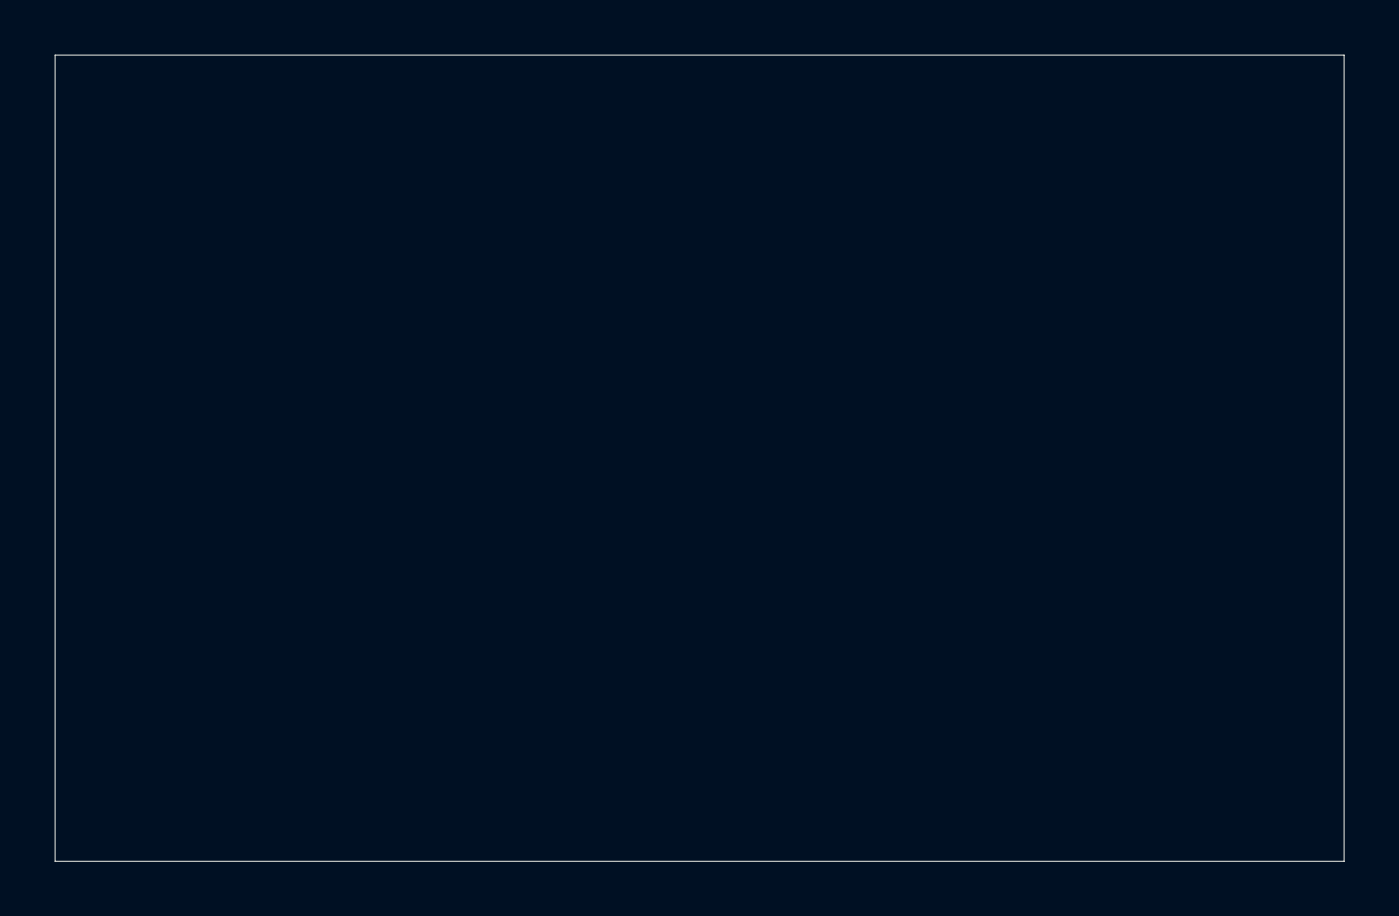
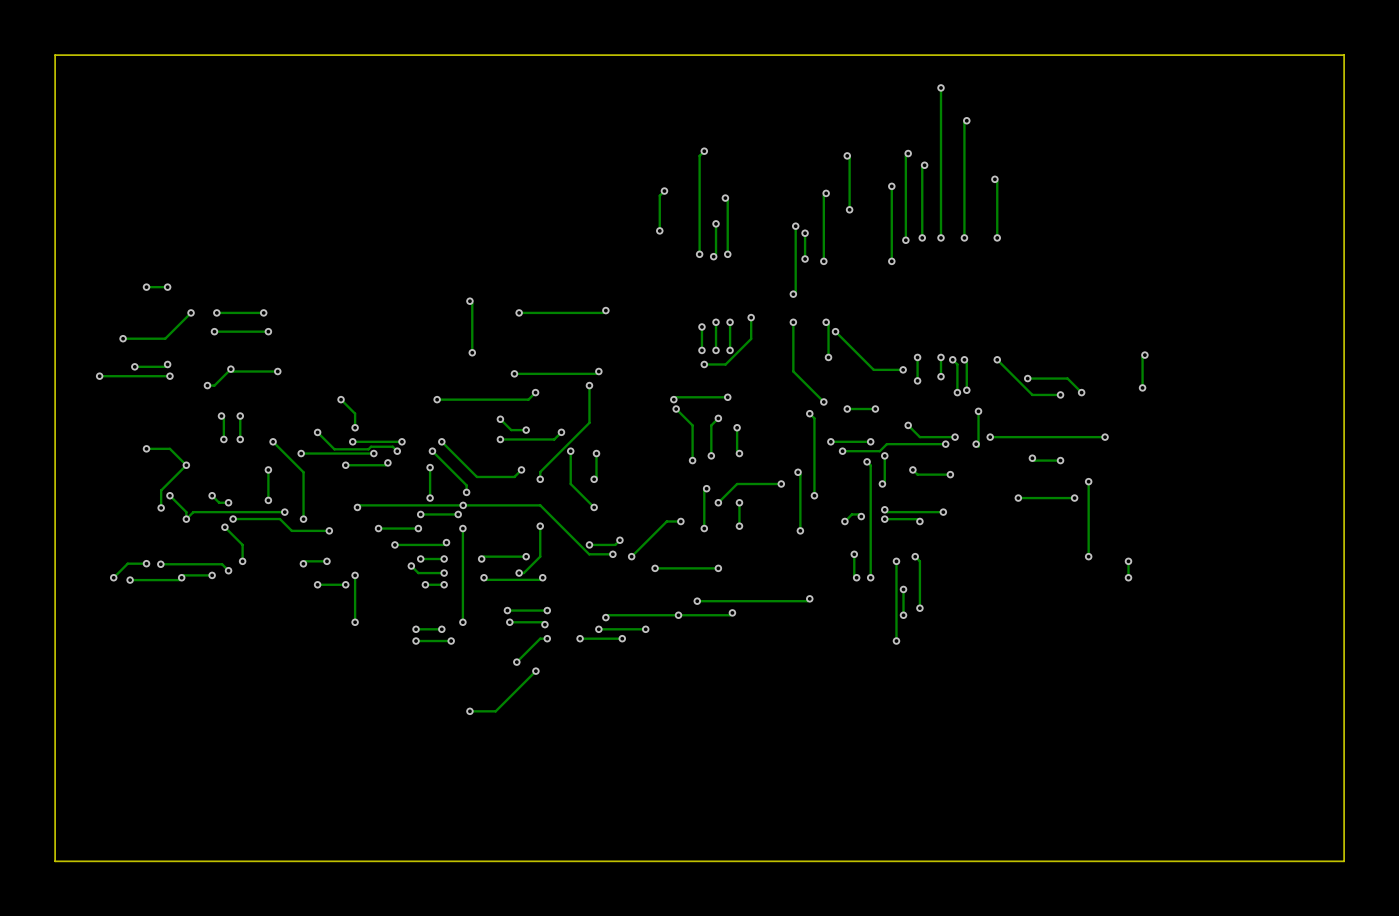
track: none -> (941, 87) (941, 237)
via: none -> (941, 87)
track: none -> (966, 120) (964, 123) (964, 237)
via: none -> (966, 120)
track: none -> (704, 151) (699, 155) (699, 254)
via: none -> (704, 151)
track: none -> (908, 153) (905, 155) (905, 240)
via: none -> (908, 153)
track: none -> (847, 155) (849, 158) (849, 209)
via: none -> (847, 155)
track: none -> (924, 165) (922, 167) (922, 237)
via: none -> (924, 165)
track: none -> (994, 179) (997, 181) (997, 237)
via: none -> (994, 179)
track: none -> (891, 186) (891, 261)
via: none -> (891, 186)
track: none -> (664, 191) (659, 195) (659, 230)
via: none -> (664, 191)
track: none -> (826, 193) (823, 195) (823, 261)
via: none -> (826, 193)
track: none -> (725, 198) (727, 200) (727, 254)
via: none -> (725, 198)
via: none -> (849, 209)
track: none -> (716, 223) (716, 254) (713, 256)
via: none -> (716, 223)
track: none -> (795, 226) (795, 291) (793, 294)
via: none -> (795, 226)
via: none -> (659, 230)
track: none -> (805, 233) (805, 259)
via: none -> (805, 233)
via: none -> (922, 237)
via: none -> (941, 237)
via: none -> (964, 237)
via: none -> (997, 237)
via: none -> (905, 240)
via: none -> (699, 254)
via: none -> (727, 254)
via: none -> (713, 256)
via: none -> (805, 259)
via: none -> (823, 261)
via: none -> (891, 261)
via: none -> (146, 287)
track: none -> (167, 287) (146, 287)
via: none -> (167, 287)
via: none -> (793, 294)
track: none -> (469, 301) (472, 303) (472, 352)
via: none -> (469, 301)
track: none -> (605, 310) (603, 312) (519, 312)
via: none -> (605, 310)
track: none -> (191, 312) (165, 338) (123, 338)
via: none -> (191, 312)
via: none -> (216, 312)
track: none -> (263, 312) (216, 312)
via: none -> (263, 312)
via: none -> (519, 312)
track: none -> (751, 317) (751, 338) (725, 364) (704, 364)
via: none -> (751, 317)
track: none -> (716, 322) (716, 350)
via: none -> (716, 322)
track: none -> (730, 322) (730, 350)
via: none -> (730, 322)
track: none -> (793, 322) (793, 371) (823, 401)
via: none -> (793, 322)
track: none -> (826, 322) (828, 324) (828, 357)
via: none -> (826, 322)
track: none -> (701, 326) (701, 350)
via: none -> (701, 326)
via: none -> (214, 331)
track: none -> (268, 331) (214, 331)
via: none -> (268, 331)
track: none -> (835, 331) (873, 369) (903, 369)
via: none -> (835, 331)
via: none -> (123, 338)
via: none -> (701, 350)
via: none -> (716, 350)
via: none -> (730, 350)
via: none -> (472, 352)
track: none -> (1144, 355) (1142, 357) (1142, 387)
via: none -> (1144, 355)
via: none -> (828, 357)
track: none -> (917, 357) (917, 380)
via: none -> (917, 357)
track: none -> (941, 357) (941, 376)
via: none -> (941, 357)
track: none -> (952, 359) (957, 364) (957, 392)
via: none -> (952, 359)
track: none -> (964, 359) (966, 359) (966, 390)
via: none -> (964, 359)
track: none -> (997, 359) (1032, 394) (1060, 394)
via: none -> (997, 359)
track: none -> (167, 364) (165, 366) (134, 366)
via: none -> (167, 364)
via: none -> (704, 364)
via: none -> (134, 366)
via: none -> (230, 369)
via: none -> (903, 369)
track: none -> (277, 371) (233, 371) (230, 369) (214, 385) (207, 385)
via: none -> (277, 371)
track: none -> (598, 371) (596, 373) (514, 373)
via: none -> (598, 371)
via: none -> (514, 373)
via: none -> (99, 376)
track: none -> (169, 376) (99, 376)
via: none -> (169, 376)
via: none -> (941, 376)
track: none -> (1027, 378) (1067, 378) (1081, 392)
via: none -> (1027, 378)
via: none -> (917, 380)
via: none -> (207, 385)
track: none -> (589, 385) (589, 422) (540, 472) (540, 479)
via: none -> (589, 385)
via: none -> (1142, 387)
via: none -> (966, 390)
track: none -> (535, 392) (528, 399) (437, 399)
via: none -> (535, 392)
via: none -> (957, 392)
via: none -> (1081, 392)
via: none -> (1060, 394)
track: none -> (727, 397) (676, 397) (673, 399)
via: none -> (727, 397)
track: none -> (341, 399) (355, 413) (355, 427)
via: none -> (341, 399)
via: none -> (437, 399)
via: none -> (673, 399)
via: none -> (823, 401)
track: none -> (676, 409) (692, 425) (692, 460)
via: none -> (676, 409)
via: none -> (847, 409)
track: none -> (875, 409) (847, 409)
via: none -> (875, 409)
track: none -> (978, 411) (978, 446) (976, 444)
via: none -> (978, 411)
track: none -> (809, 413) (814, 418) (814, 495)
via: none -> (809, 413)
track: none -> (221, 416) (223, 418) (223, 439)
via: none -> (221, 416)
track: none -> (240, 416) (240, 439)
via: none -> (240, 416)
track: none -> (718, 418) (711, 425) (711, 455)
via: none -> (718, 418)
track: none -> (500, 419) (511, 430) (526, 430)
via: none -> (500, 419)
track: none -> (908, 425) (919, 437) (955, 437)
via: none -> (908, 425)
via: none -> (355, 427)
track: none -> (737, 427) (737, 451) (739, 453)
via: none -> (737, 427)
via: none -> (526, 430)
track: none -> (317, 432) (334, 449) (392, 446) (397, 451)
via: none -> (317, 432)
track: none -> (561, 432) (554, 439) (500, 439)
via: none -> (561, 432)
via: none -> (955, 437)
via: none -> (990, 437)
track: none -> (1105, 437) (990, 437)
via: none -> (1105, 437)
via: none -> (223, 439)
via: none -> (240, 439)
via: none -> (500, 439)
track: none -> (273, 441) (303, 472) (303, 519)
via: none -> (273, 441)
via: none -> (352, 441)
track: none -> (401, 441) (352, 441)
via: none -> (401, 441)
track: none -> (441, 441) (476, 476) (514, 476) (521, 469)
via: none -> (441, 441)
via: none -> (830, 441)
track: none -> (870, 441) (830, 441)
via: none -> (870, 441)
track: none -> (945, 444) (886, 444) (879, 451) (842, 451)
via: none -> (945, 444)
via: none -> (976, 444)
track: none -> (146, 448) (169, 448) (186, 465) (161, 490) (161, 507)
via: none -> (146, 448)
via: none -> (397, 451)
track: none -> (432, 451) (466, 485) (466, 492)
via: none -> (432, 451)
track: none -> (570, 451) (570, 484) (594, 507)
via: none -> (570, 451)
via: none -> (842, 451)
via: none -> (301, 453)
track: none -> (373, 453) (301, 453)
via: none -> (373, 453)
track: none -> (596, 453) (596, 476) (594, 479)
via: none -> (596, 453)
via: none -> (739, 453)
via: none -> (711, 455)
track: none -> (884, 455) (884, 481) (882, 484)
via: none -> (884, 455)
track: none -> (1032, 458) (1034, 460) (1060, 460)
via: none -> (1032, 458)
via: none -> (692, 460)
via: none -> (1060, 460)
track: none -> (867, 461) (870, 465) (870, 577)
via: none -> (867, 461)
track: none -> (387, 462) (385, 465) (345, 465)
via: none -> (387, 462)
via: none -> (186, 465)
via: none -> (345, 465)
track: none -> (430, 467) (430, 498)
via: none -> (430, 467)
track: none -> (268, 469) (268, 500)
via: none -> (268, 469)
via: none -> (521, 469)
track: none -> (912, 469) (917, 474) (950, 474)
via: none -> (912, 469)
track: none -> (798, 472) (800, 474) (800, 530)
via: none -> (798, 472)
via: none -> (950, 474)
via: none -> (540, 479)
via: none -> (594, 479)
track: none -> (1088, 481) (1088, 556)
via: none -> (1088, 481)
track: none -> (781, 484) (737, 484) (718, 502)
via: none -> (781, 484)
via: none -> (882, 484)
track: none -> (706, 488) (704, 491) (704, 528)
via: none -> (706, 488)
via: none -> (466, 492)
track: none -> (169, 495) (186, 512) (186, 519) (193, 512) (284, 512)
via: none -> (169, 495)
track: none -> (212, 495) (219, 502) (228, 502)
via: none -> (212, 495)
via: none -> (814, 495)
via: none -> (430, 498)
via: none -> (1018, 498)
track: none -> (1074, 498) (1018, 498)
via: none -> (1074, 498)
via: none -> (268, 500)
via: none -> (228, 502)
via: none -> (718, 502)
track: none -> (739, 502) (739, 526)
via: none -> (739, 502)
via: none -> (463, 505)
via: none -> (161, 507)
track: none -> (357, 507) (359, 505) (540, 505) (589, 554) (612, 554)
via: none -> (357, 507)
via: none -> (594, 507)
track: none -> (884, 509) (887, 512) (943, 512)
via: none -> (884, 509)
via: none -> (284, 512)
via: none -> (943, 512)
via: none -> (420, 514)
track: none -> (458, 514) (420, 514)
via: none -> (458, 514)
track: none -> (861, 516) (859, 514) (851, 514) (844, 521)
via: none -> (861, 516)
via: none -> (186, 519)
track: none -> (233, 519) (279, 519) (291, 530) (329, 530)
via: none -> (233, 519)
via: none -> (303, 519)
track: none -> (884, 519) (917, 519) (919, 521)
via: none -> (884, 519)
track: none -> (680, 521) (666, 521) (631, 556)
via: none -> (680, 521)
via: none -> (844, 521)
via: none -> (919, 521)
track: none -> (540, 526) (540, 556) (523, 573) (519, 573)
via: none -> (540, 526)
via: none -> (739, 526)
track: none -> (224, 527) (242, 544) (242, 561)
via: none -> (224, 527)
via: none -> (378, 528)
track: none -> (418, 528) (378, 528)
via: none -> (418, 528)
track: none -> (462, 528) (462, 622)
via: none -> (462, 528)
via: none -> (704, 528)
via: none -> (329, 530)
via: none -> (800, 530)
track: none -> (619, 540) (615, 544) (589, 544)
via: none -> (619, 540)
track: none -> (446, 542) (444, 544) (394, 544)
via: none -> (446, 542)
via: none -> (394, 544)
via: none -> (589, 544)
via: none -> (612, 554)
track: none -> (854, 554) (854, 575) (856, 577)
via: none -> (854, 554)
track: none -> (526, 556) (484, 556) (481, 558)
via: none -> (526, 556)
via: none -> (631, 556)
track: none -> (915, 556) (919, 561) (919, 608)
via: none -> (915, 556)
via: none -> (1088, 556)
via: none -> (420, 558)
track: none -> (444, 558) (420, 558)
via: none -> (444, 558)
via: none -> (481, 558)
via: none -> (242, 561)
track: none -> (326, 561) (305, 561) (303, 563)
via: none -> (326, 561)
track: none -> (896, 561) (896, 641)
via: none -> (896, 561)
track: none -> (1128, 561) (1128, 577)
via: none -> (1128, 561)
track: none -> (146, 563) (127, 563) (113, 577)
via: none -> (146, 563)
via: none -> (303, 563)
track: none -> (160, 564) (222, 564) (228, 570)
via: none -> (160, 564)
track: none -> (411, 566) (418, 573) (444, 573)
via: none -> (411, 566)
via: none -> (655, 568)
track: none -> (718, 568) (655, 568)
via: none -> (718, 568)
via: none -> (228, 570)
via: none -> (444, 573)
via: none -> (519, 573)
track: none -> (212, 575) (184, 575) (179, 580) (130, 580)
via: none -> (212, 575)
track: none -> (355, 575) (355, 622)
via: none -> (355, 575)
via: none -> (113, 577)
via: none -> (181, 577)
via: none -> (484, 577)
track: none -> (542, 577) (540, 579) (486, 579) (484, 577)
via: none -> (542, 577)
via: none -> (856, 577)
via: none -> (870, 577)
via: none -> (1128, 577)
via: none -> (130, 580)
via: none -> (317, 584)
track: none -> (345, 584) (317, 584)
via: none -> (345, 584)
via: none -> (425, 584)
track: none -> (444, 584) (425, 584)
via: none -> (444, 584)
track: none -> (903, 589) (903, 615)
via: none -> (903, 589)
track: none -> (809, 598) (807, 601) (697, 601)
via: none -> (809, 598)
via: none -> (697, 601)
via: none -> (919, 608)
via: none -> (507, 610)
track: none -> (547, 610) (507, 610)
via: none -> (547, 610)
track: none -> (732, 612) (730, 615) (608, 615) (605, 617)
via: none -> (732, 612)
via: none -> (678, 615)
via: none -> (903, 615)
via: none -> (605, 617)
via: none -> (355, 622)
via: none -> (462, 622)
track: none -> (509, 622) (542, 622) (544, 624)
via: none -> (509, 622)
via: none -> (544, 624)
via: none -> (416, 629)
track: none -> (441, 629) (416, 629)
via: none -> (441, 629)
via: none -> (598, 629)
track: none -> (645, 629) (598, 629)
via: none -> (645, 629)
track: none -> (547, 638) (540, 638) (516, 662)
via: none -> (547, 638)
via: none -> (580, 638)
track: none -> (622, 638) (580, 638)
via: none -> (622, 638)
via: none -> (416, 641)
track: none -> (451, 641) (416, 641)
via: none -> (451, 641)
via: none -> (896, 641)
via: none -> (516, 662)
track: none -> (535, 671) (495, 711) (469, 711)
via: none -> (535, 671)
via: none -> (469, 711)

